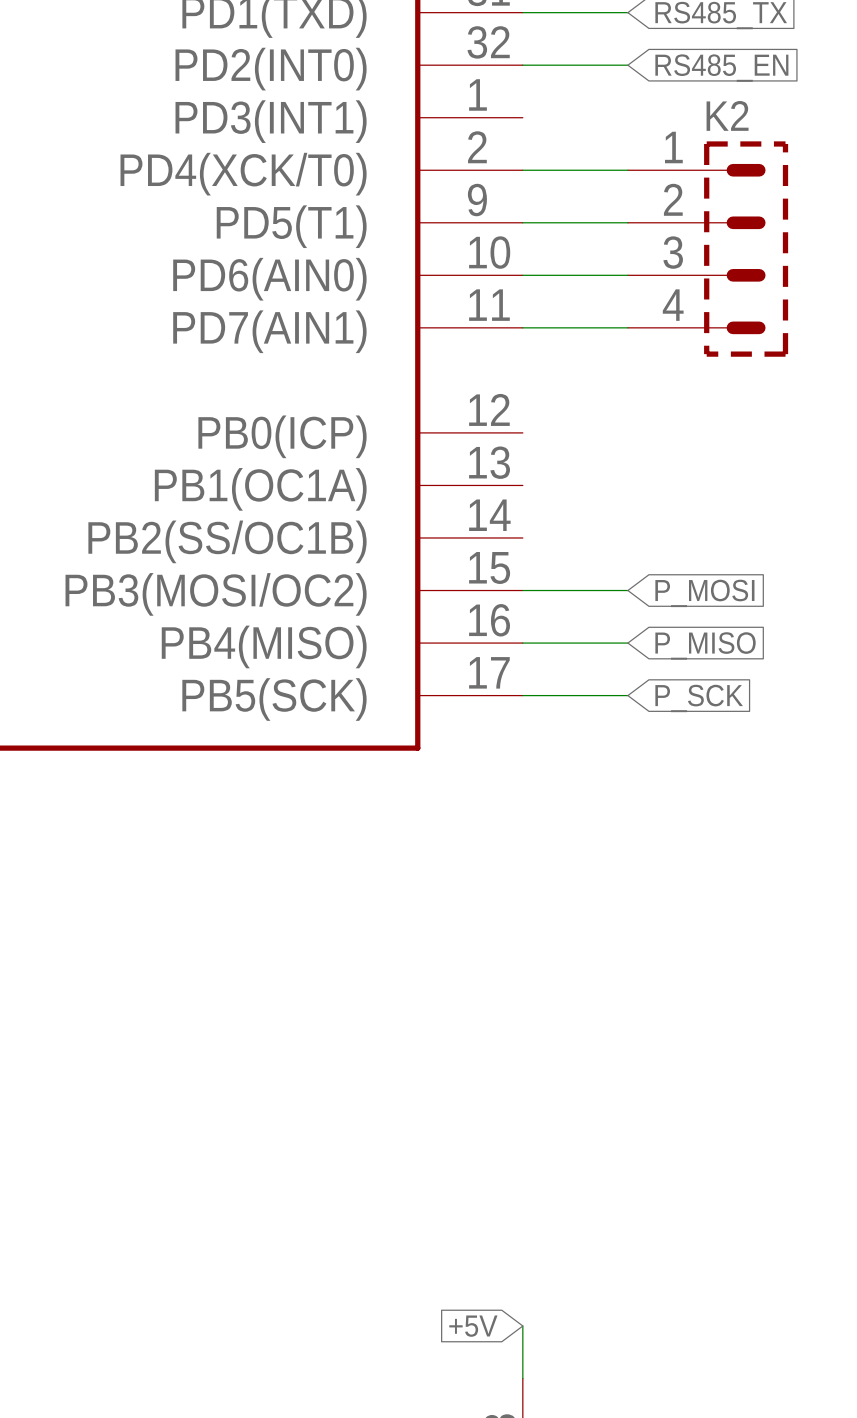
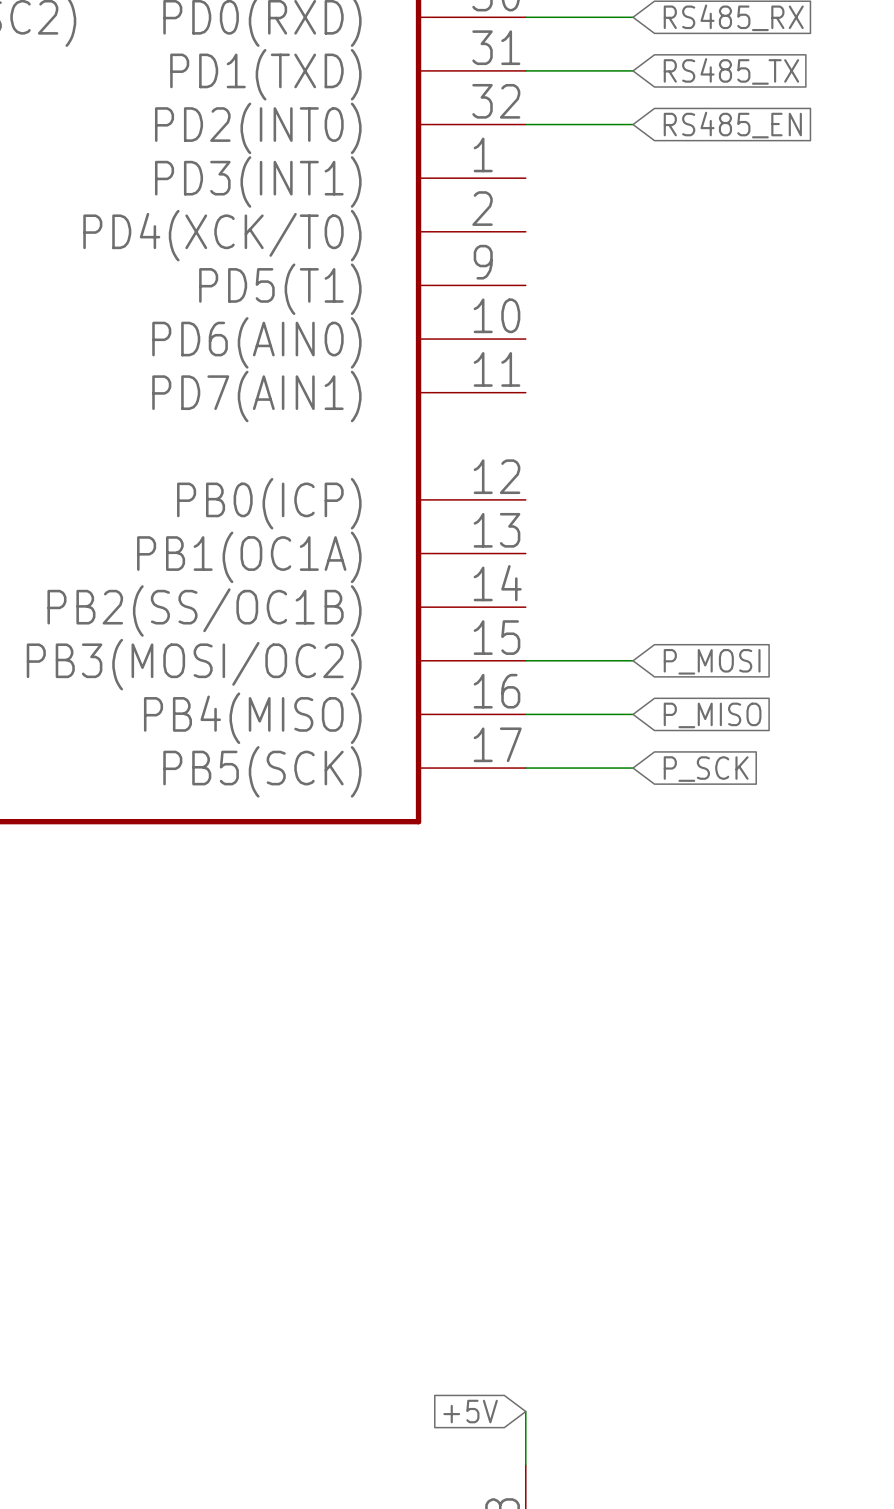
wire: (522, 170) (627, 170) -> none
wire: (522, 222) (627, 222) -> none
K2: (708, 249) -> none
wire: (522, 275) (627, 275) -> none
wire: (522, 327) (627, 327) -> none

